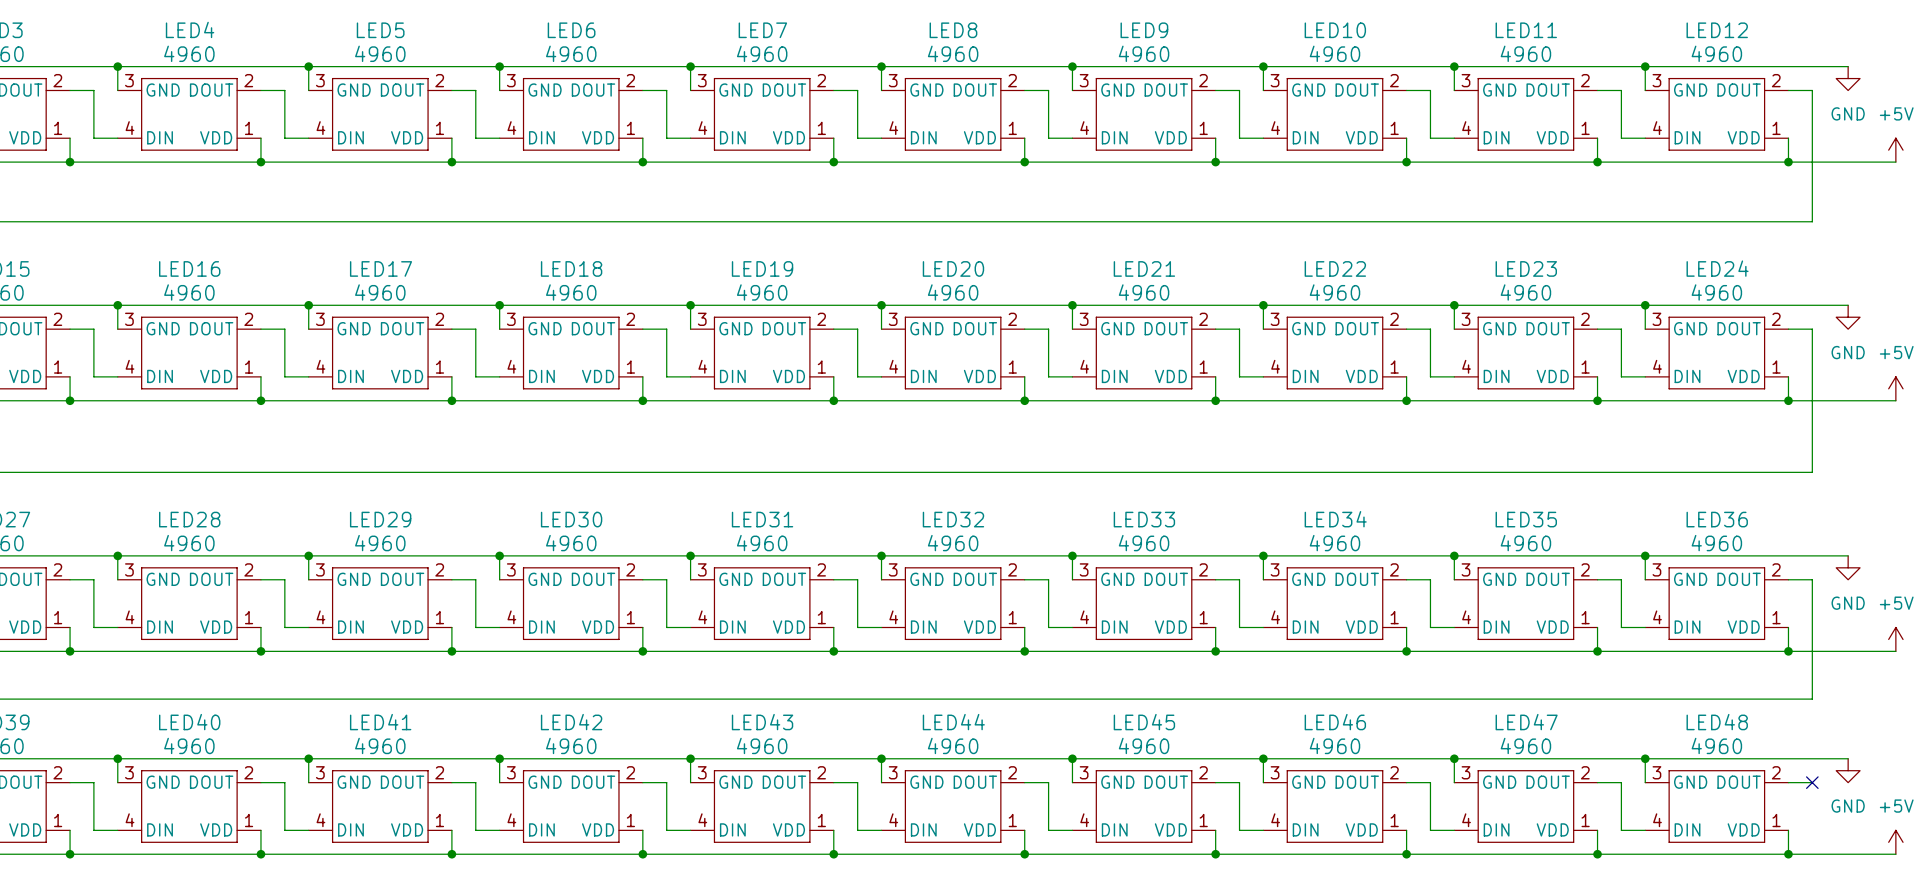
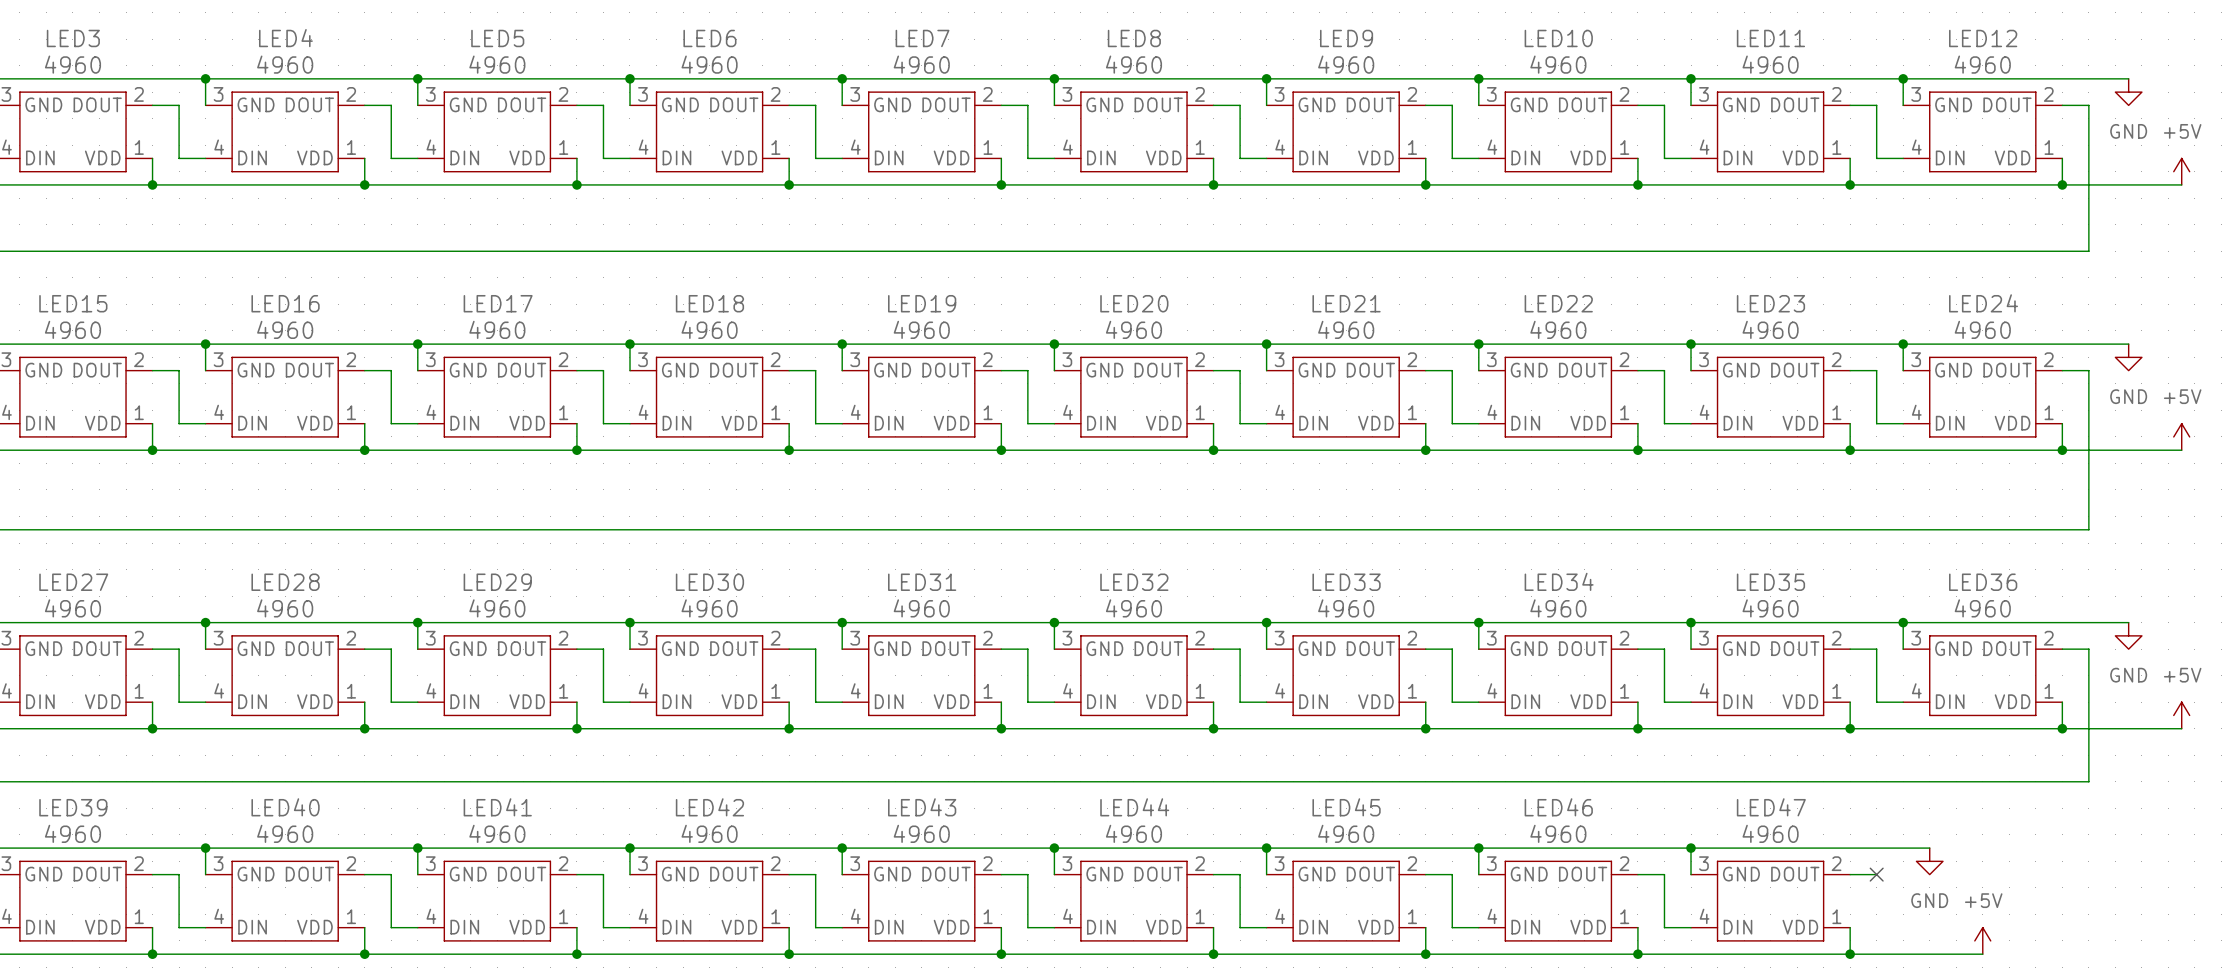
wire: (1645, 758) (1645, 782) -> none
junction: (1645, 758) -> none
wire: (1669, 758) (1848, 758) -> none
power symbol position: GND (1848, 770) -> GND (1929, 861)
wire: (1621, 782) (1621, 830) (1645, 830) -> none
no-connect mark: none -> (1876, 874)
wire: (1788, 782) (1812, 782) -> none
no-connect mark: (1812, 782) -> none
LED48: 4960 (1716, 806) -> none
wire: (1788, 830) (1788, 854) -> none
power symbol position: +5V (1895, 842) -> +5V (1982, 940)
wire: (1716, 854) (1895, 854) -> none
junction: (1788, 854) -> none

